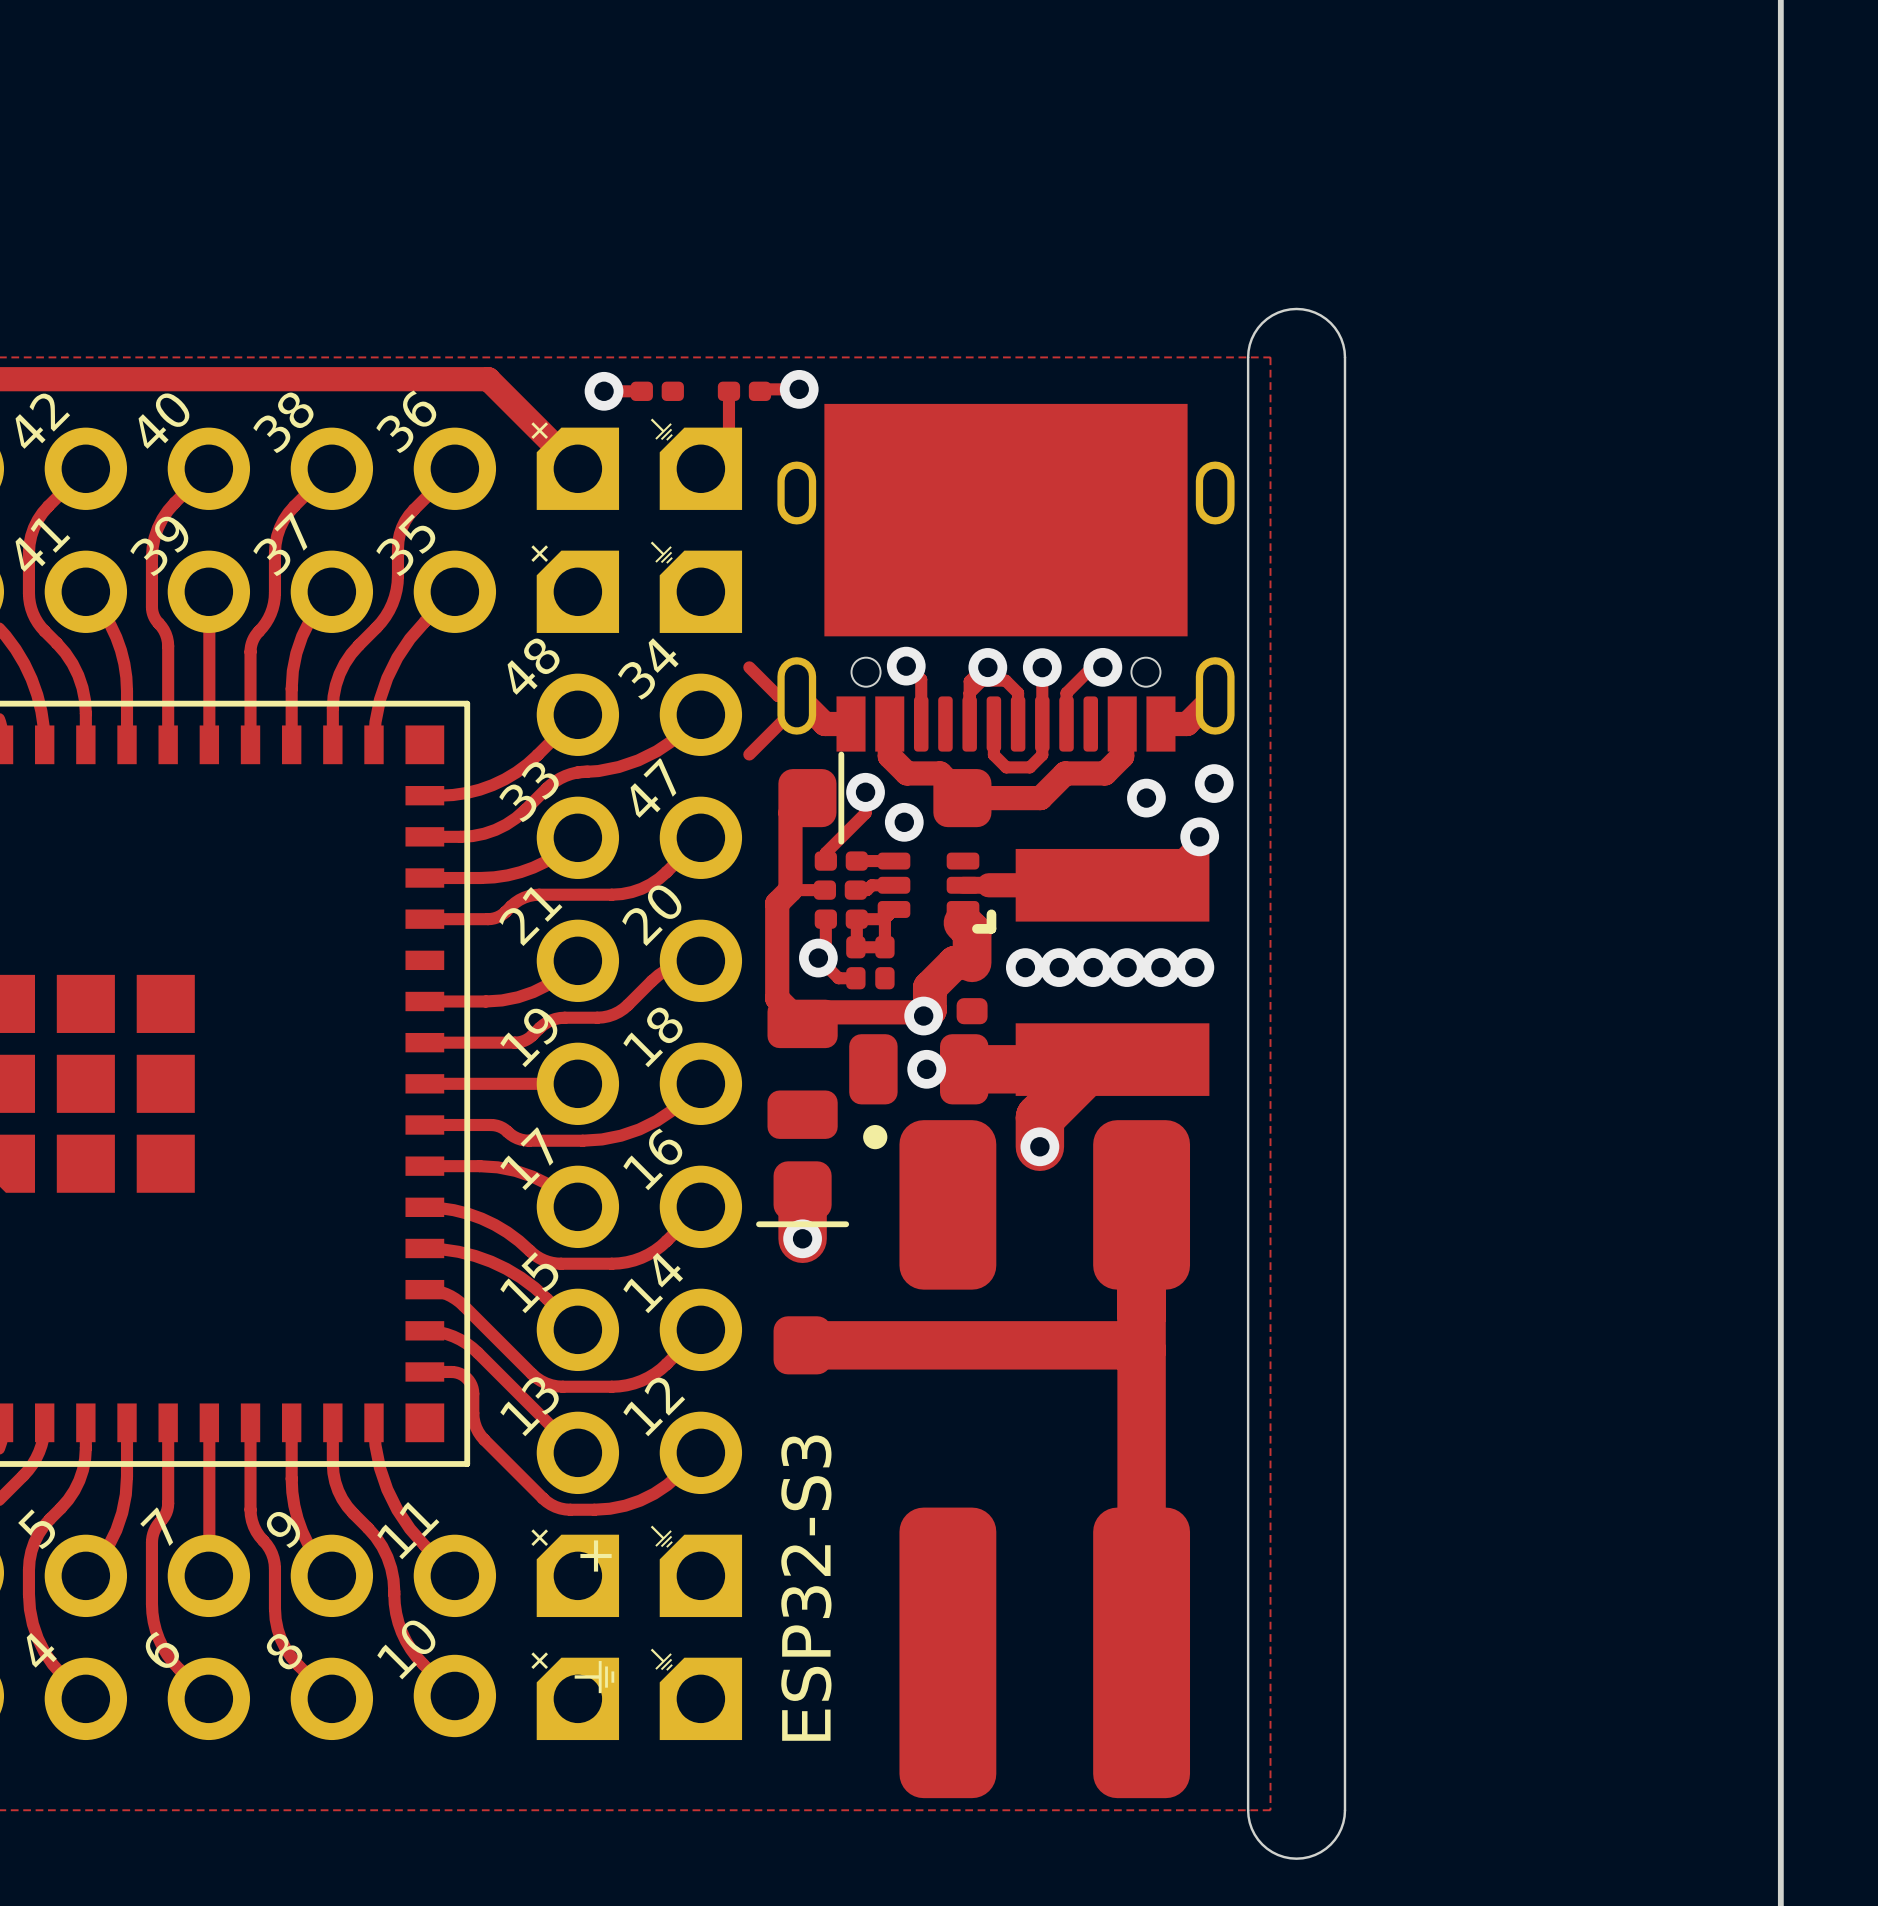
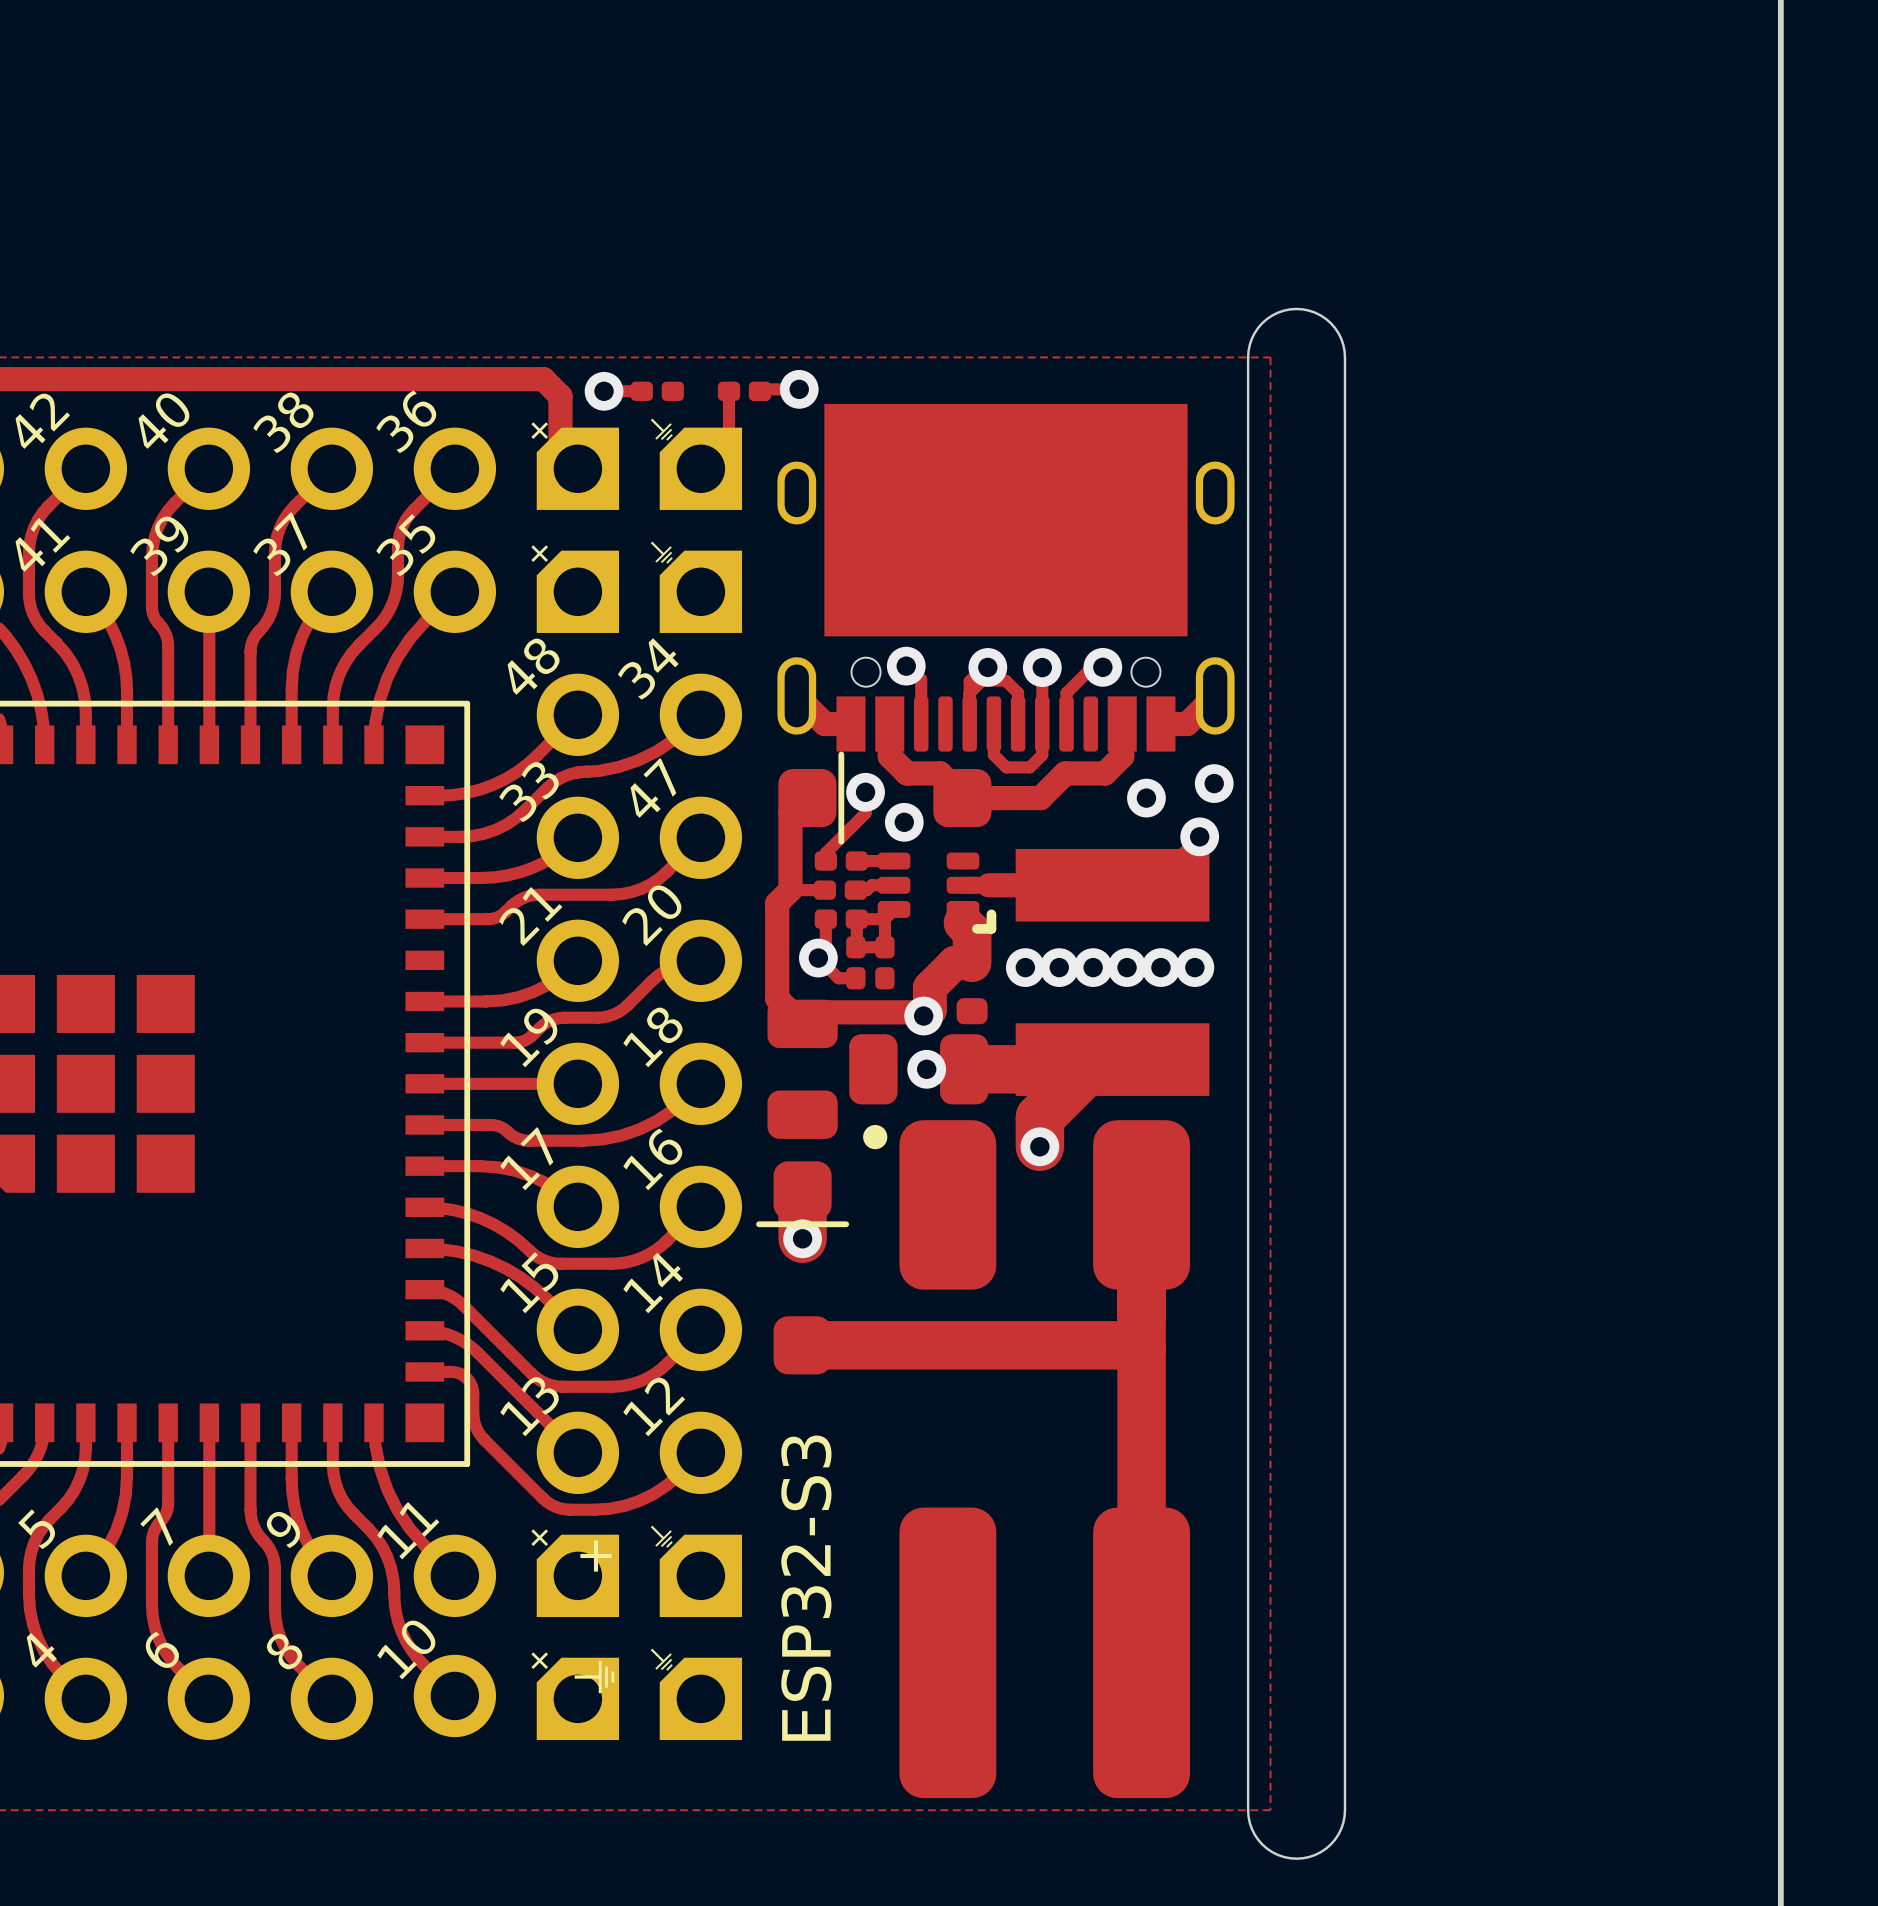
track: (488, 379) (577, 468) -> (488, 379) (543, 379) (560, 396) (560, 451)
track: (749, 667) (777, 695) (796, 695) -> none
track: (796, 707) (749, 754) -> none

